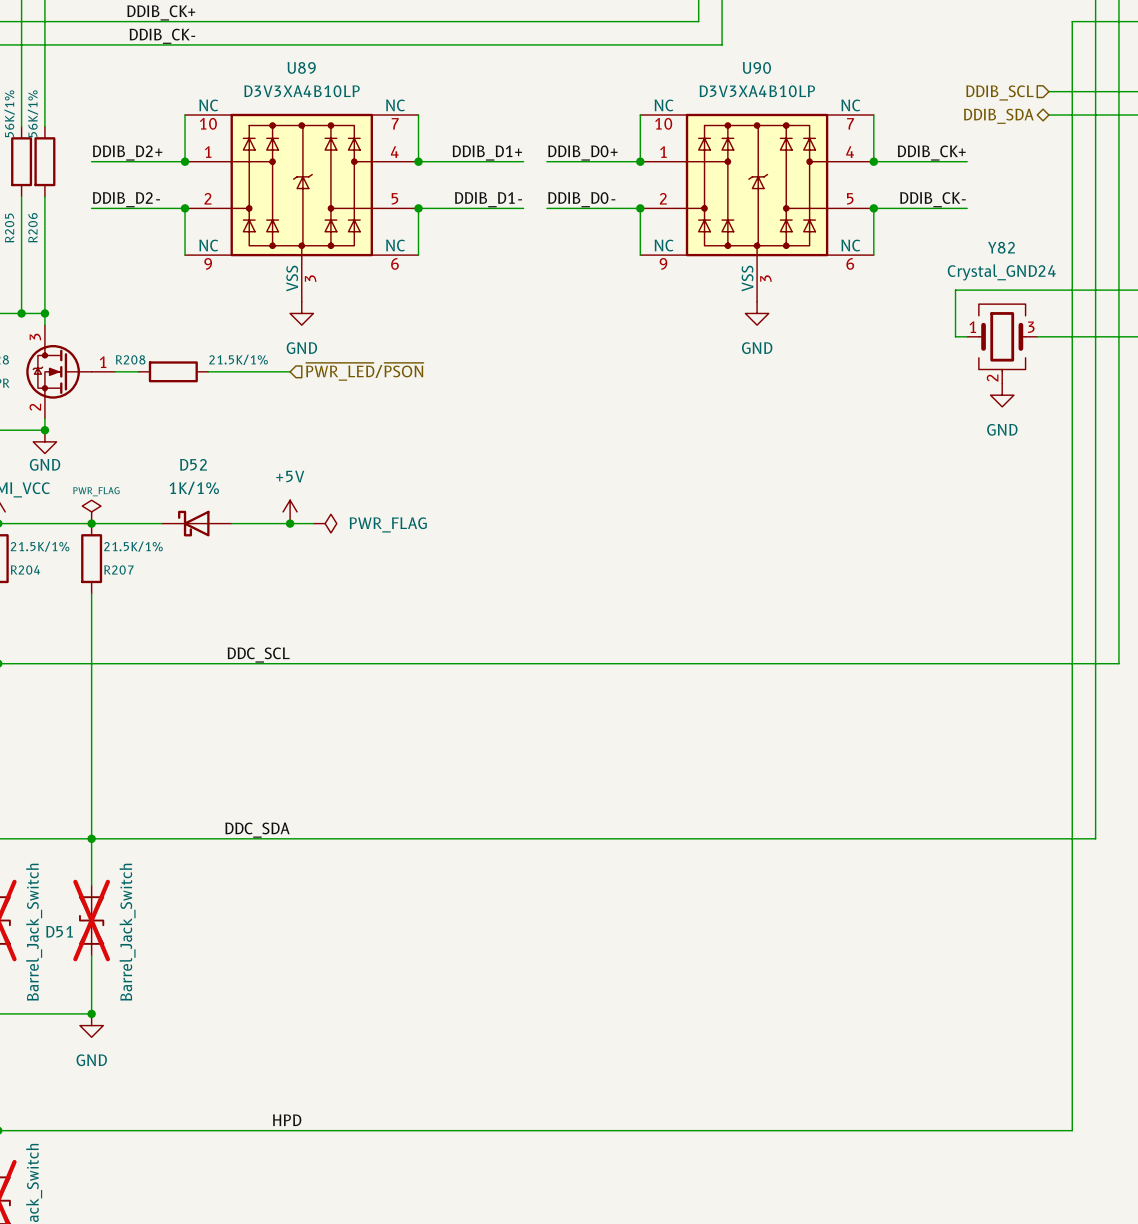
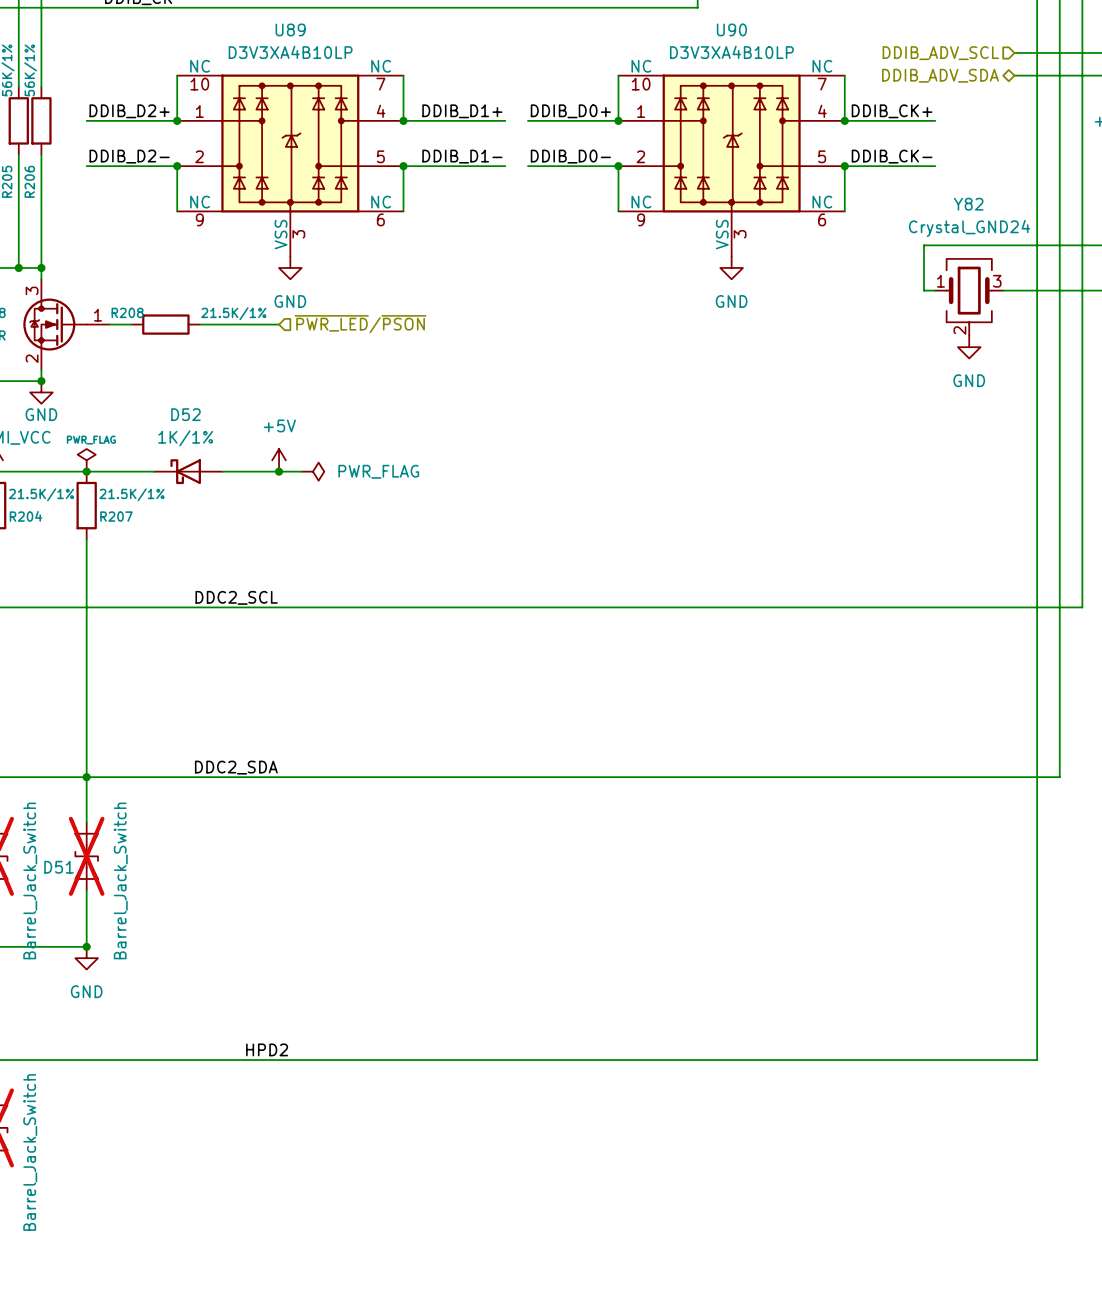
hierarchical label: DDIB_SCL (999, 92) -> DDIB_ADV_SCL (940, 53)
hierarchical label: DDIB_SDA (998, 116) -> DDIB_ADV_SDA (940, 75)
label: DDC_SCL (258, 655) -> DDC2_SCL (236, 597)
label: DDC_SDA (257, 830) -> DDC2_SDA (236, 767)
label: HPD (287, 1120) -> HPD2 (267, 1049)

